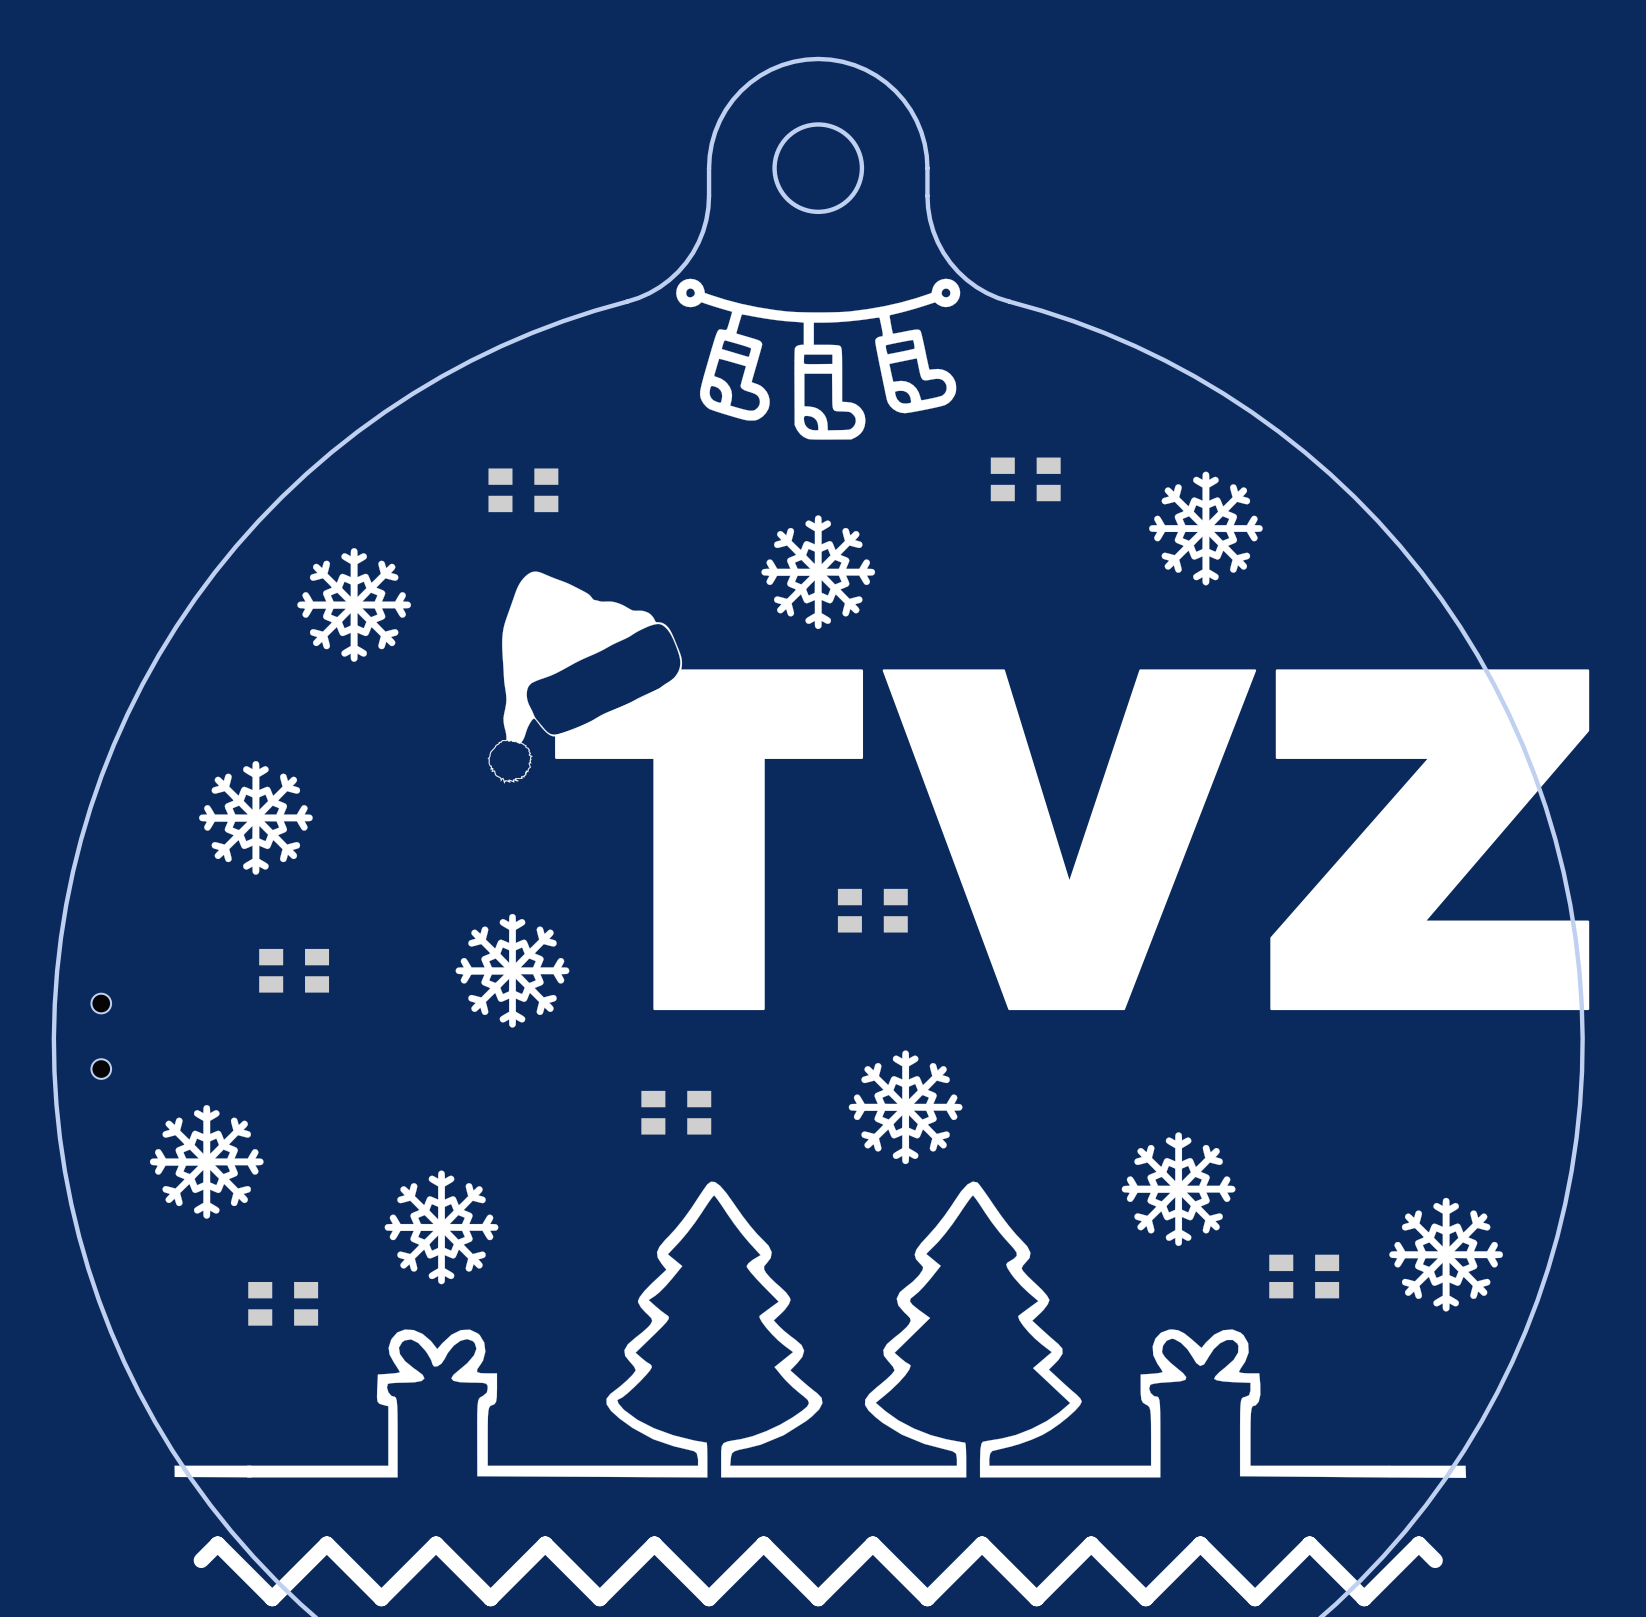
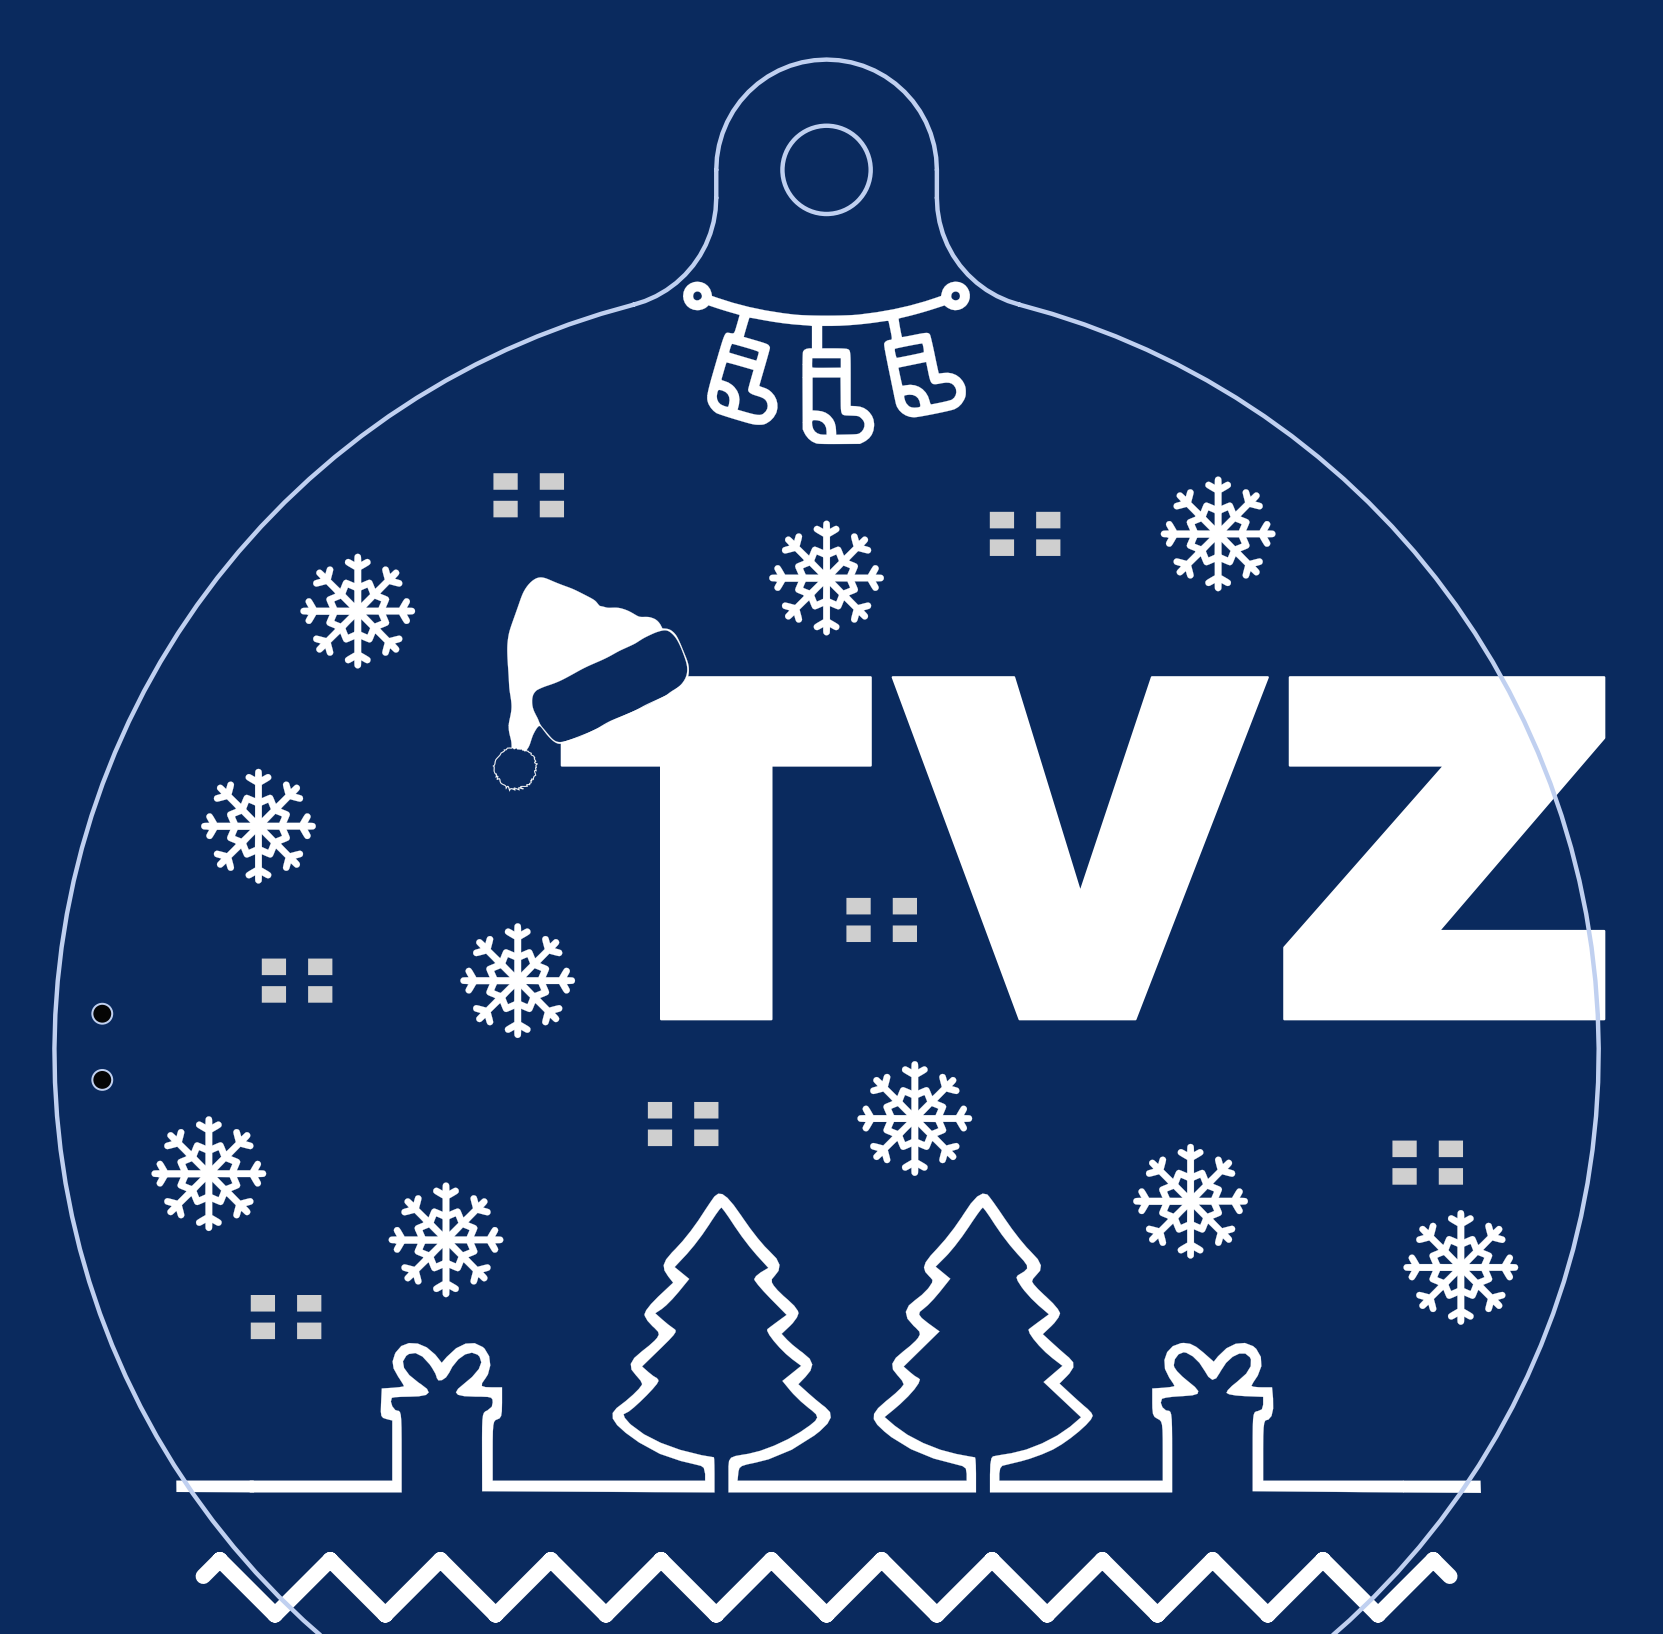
part position: (1025, 479) -> (1025, 533)
part position: (1304, 1276) -> (1427, 1162)

